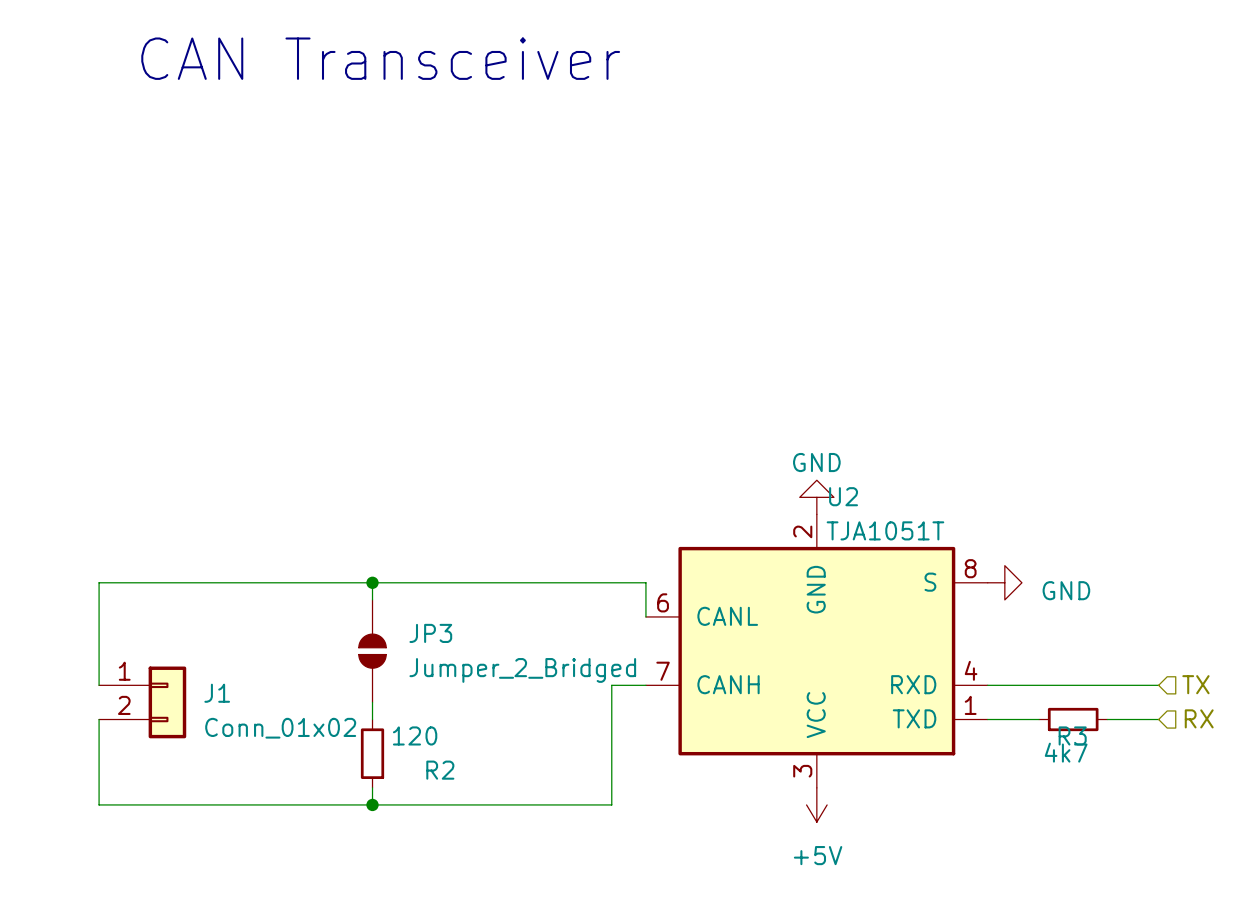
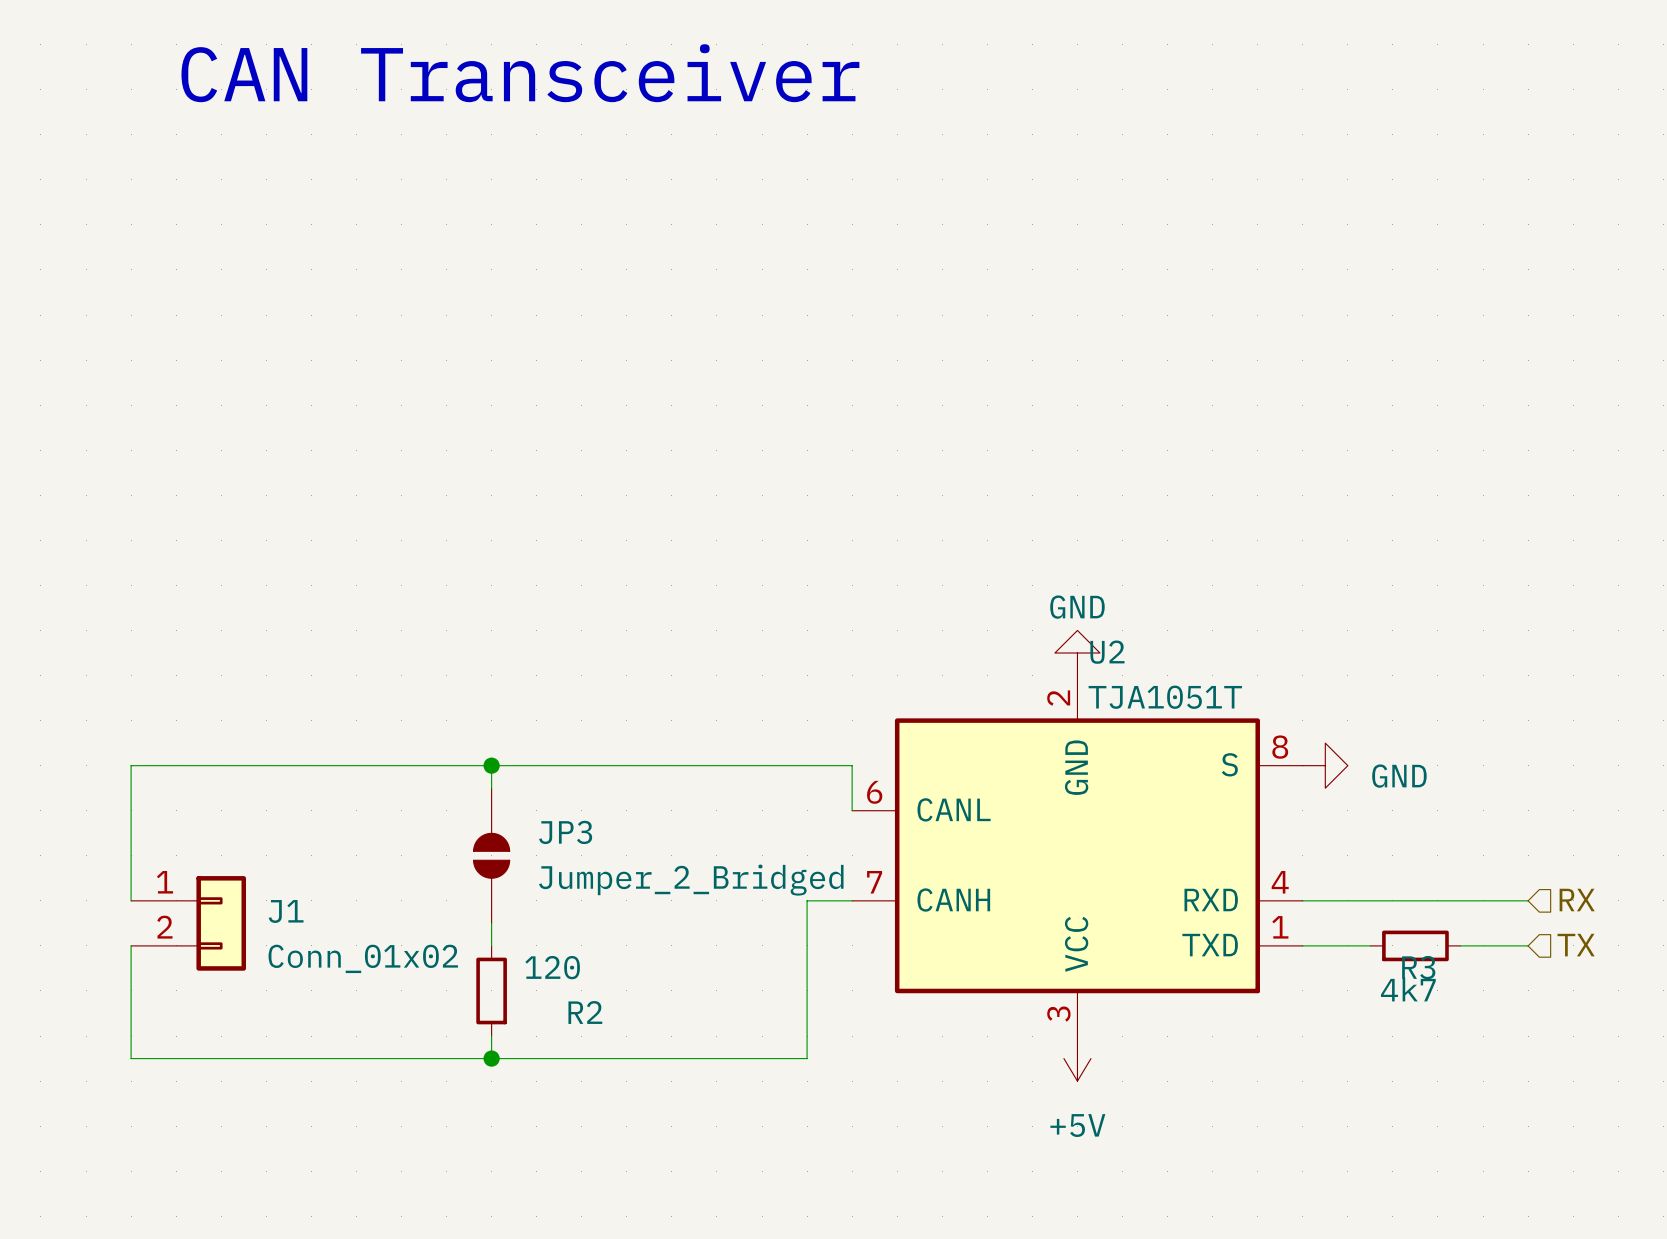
hierarchical label: TX (1195, 684) -> RX (1577, 900)
hierarchical label: RX (1199, 718) -> TX (1576, 945)

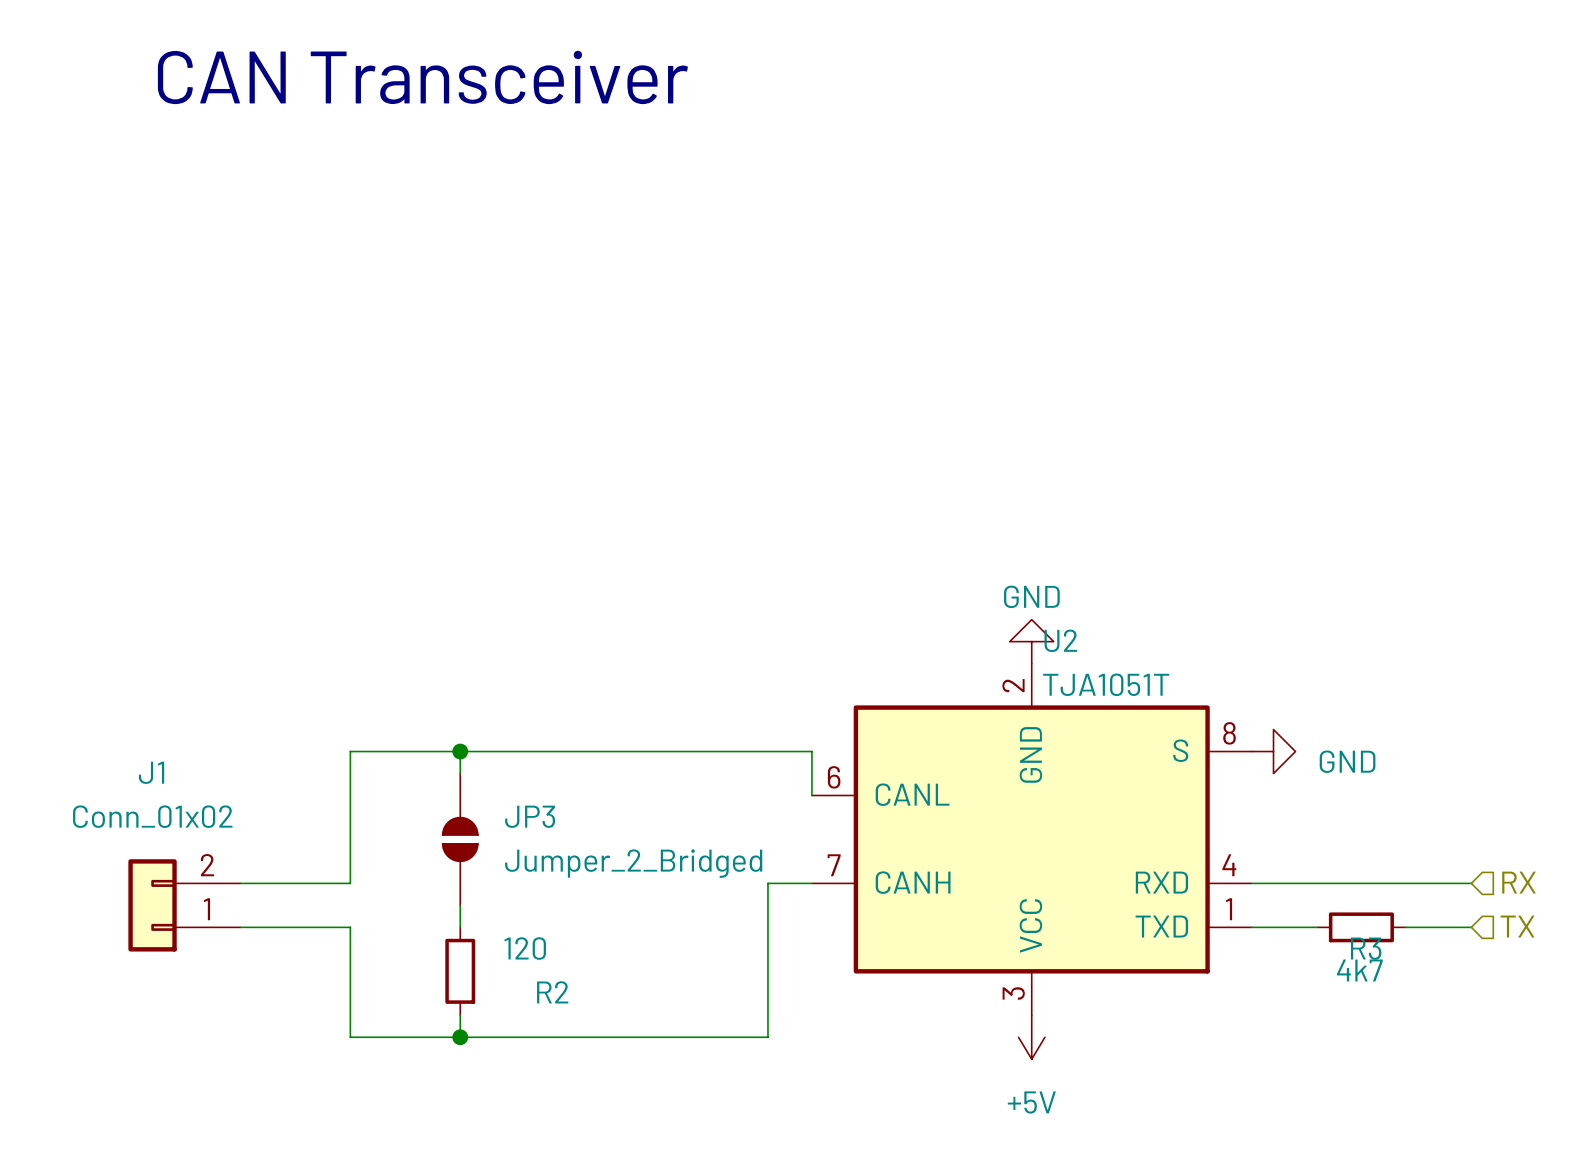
wire: (378, 765) (131, 765) (131, 900) -> (350, 751) (350, 883) (240, 883)
J1 name position: J1 (286, 911) -> J1 (151, 772)
J1 rotation: 0° (221, 923) -> 180° (152, 905)
wire: (131, 945) (131, 1058) (378, 1058) -> (240, 927) (350, 927) (350, 1037)
J1 value position: Conn_01x02 (363, 958) -> Conn_01x02 (152, 816)

